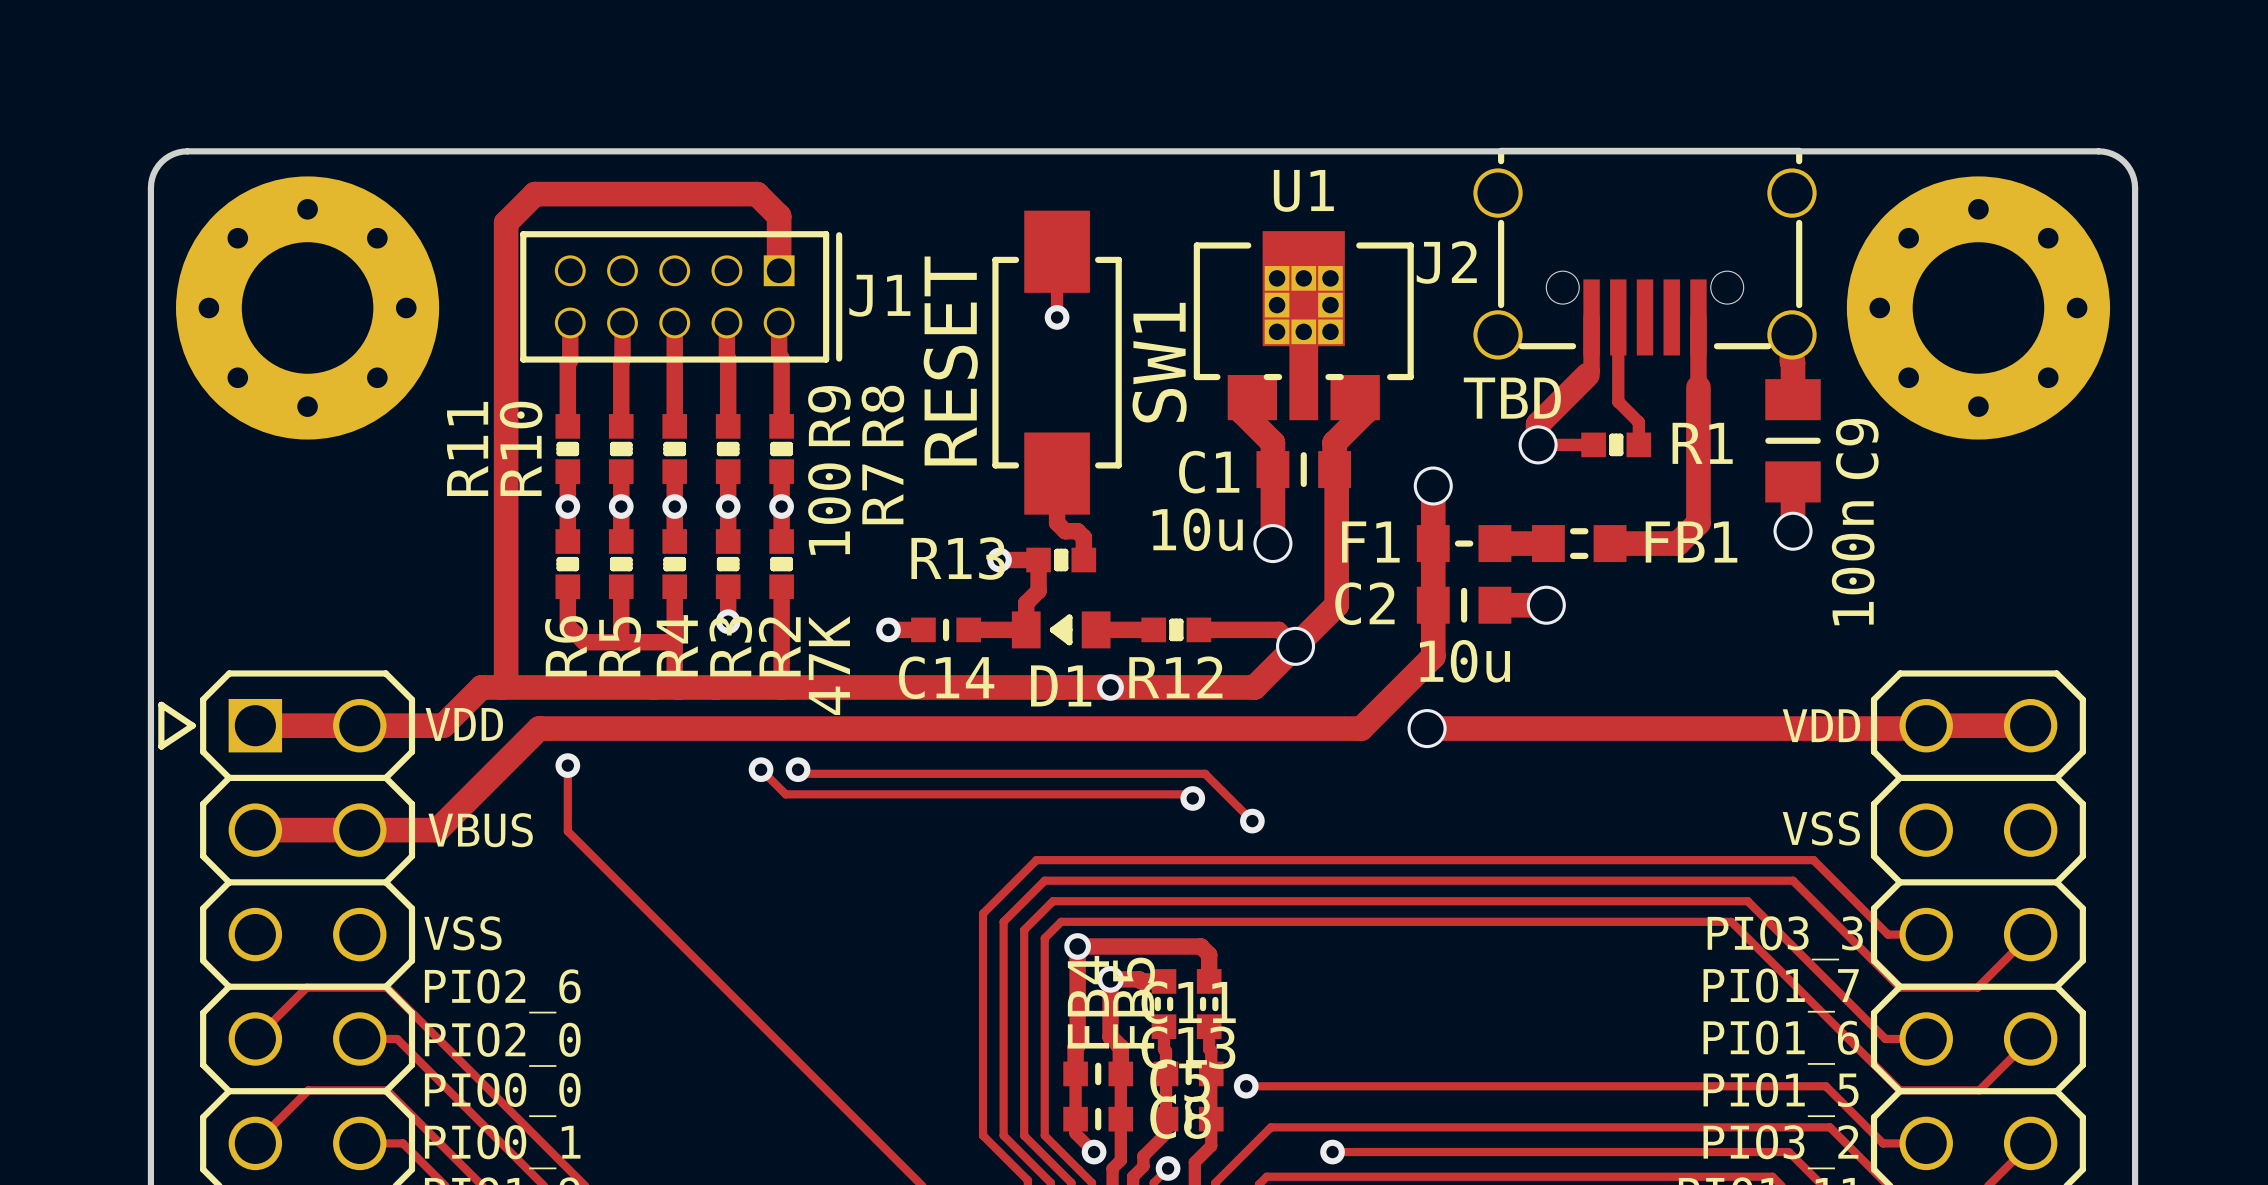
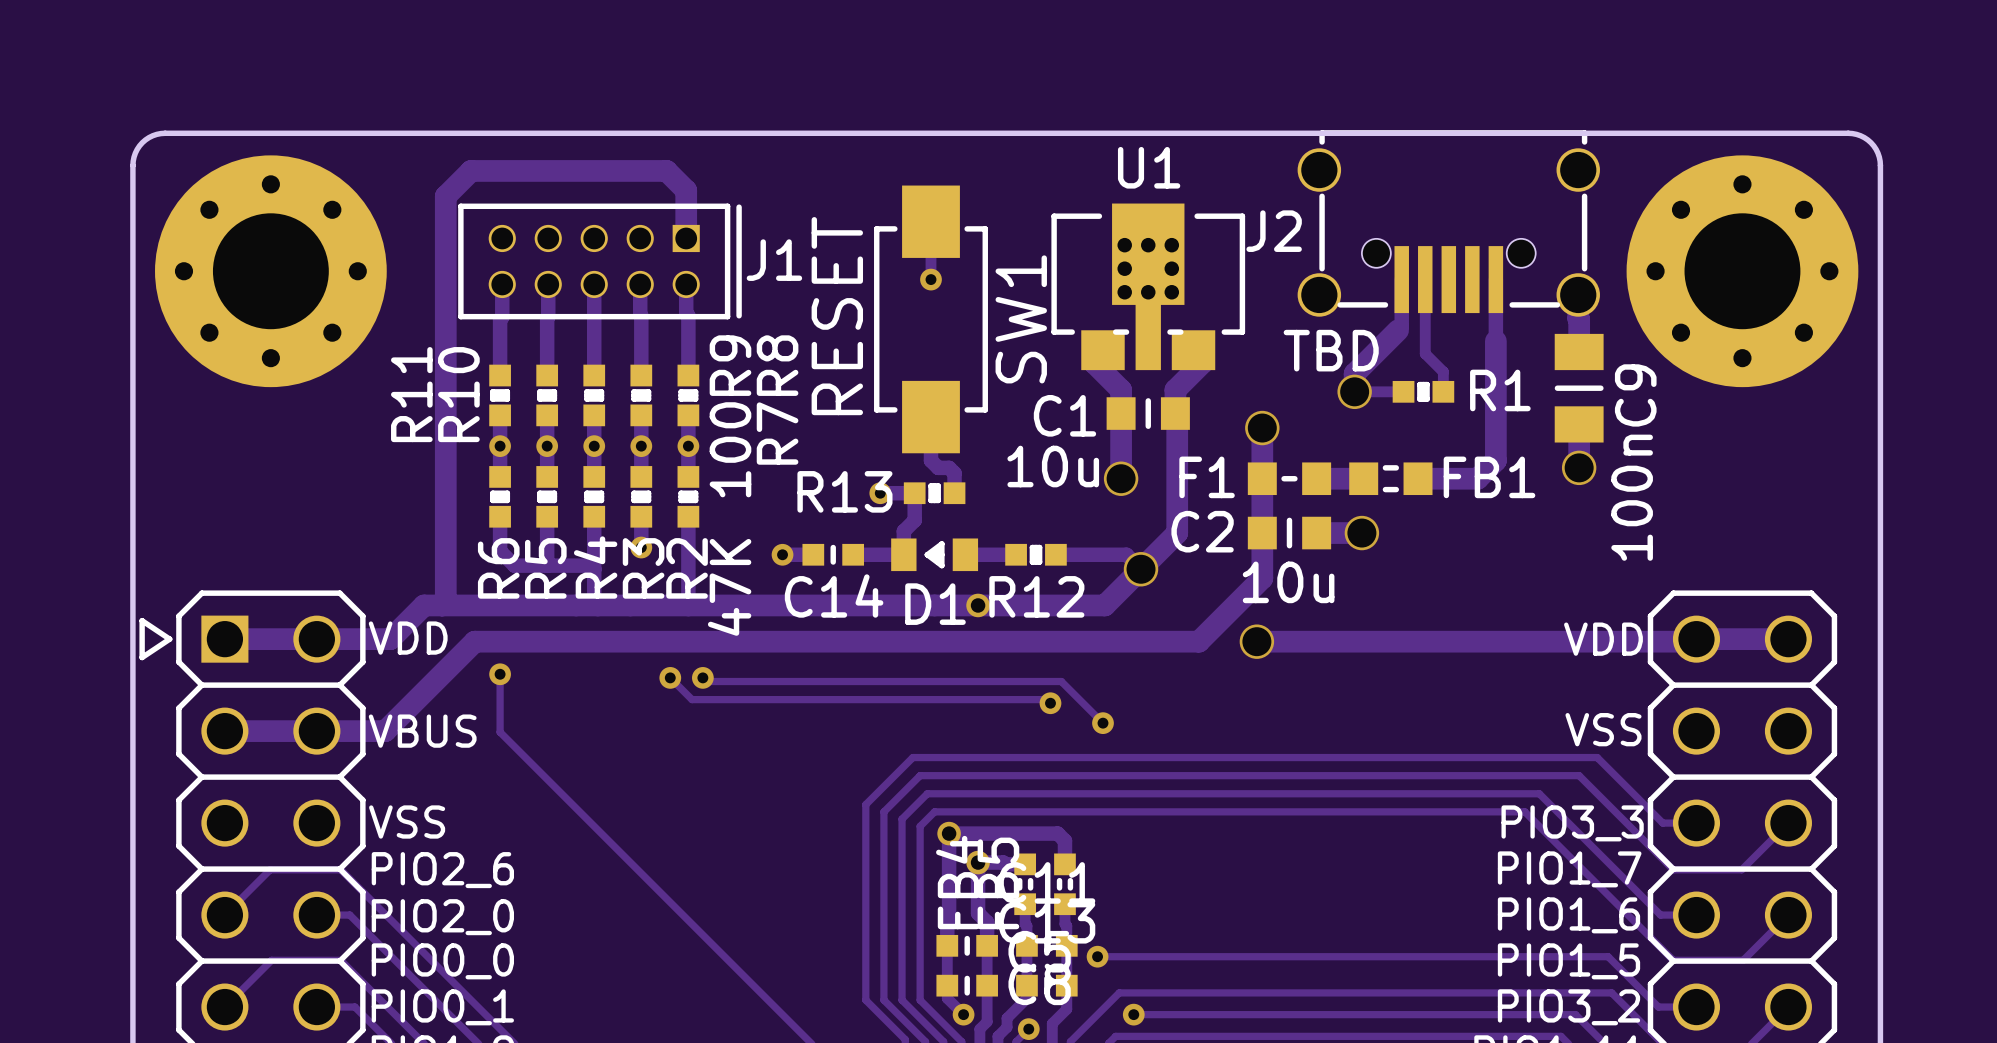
track: none -> (1133, 1014) (1173, 1014)
via position: (1332, 1152) -> (1133, 1014)

